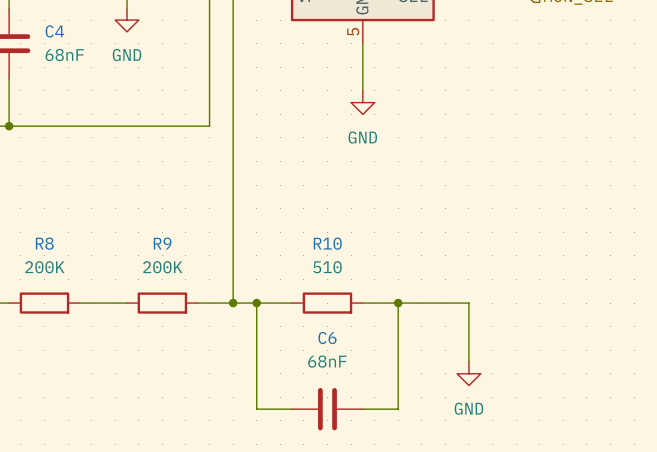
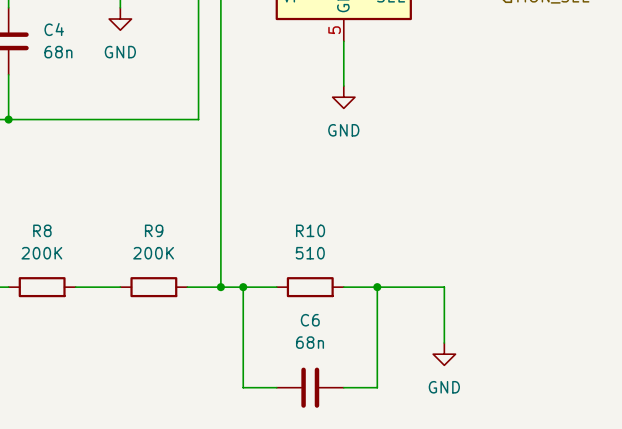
C4 value: 68nF (64, 54) -> 68n (58, 52)
C6 value: 68nF (327, 361) -> 68n (310, 342)

